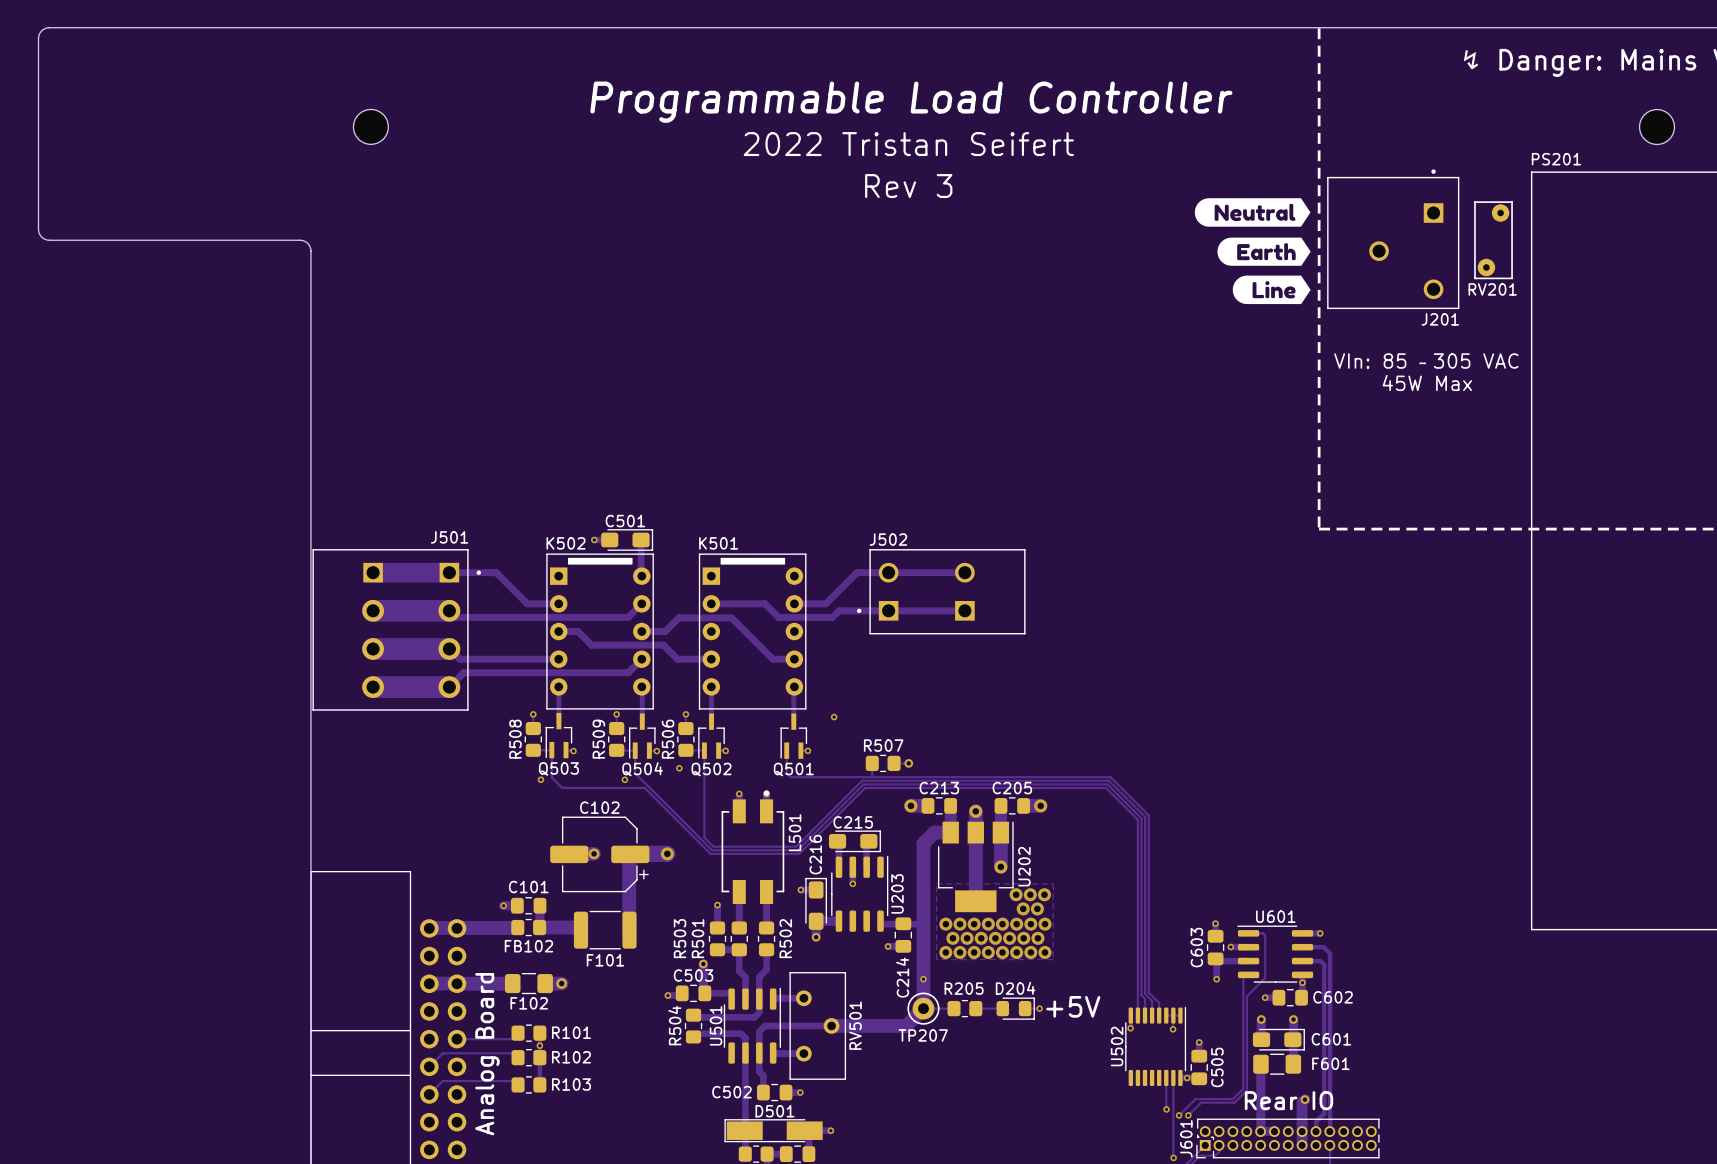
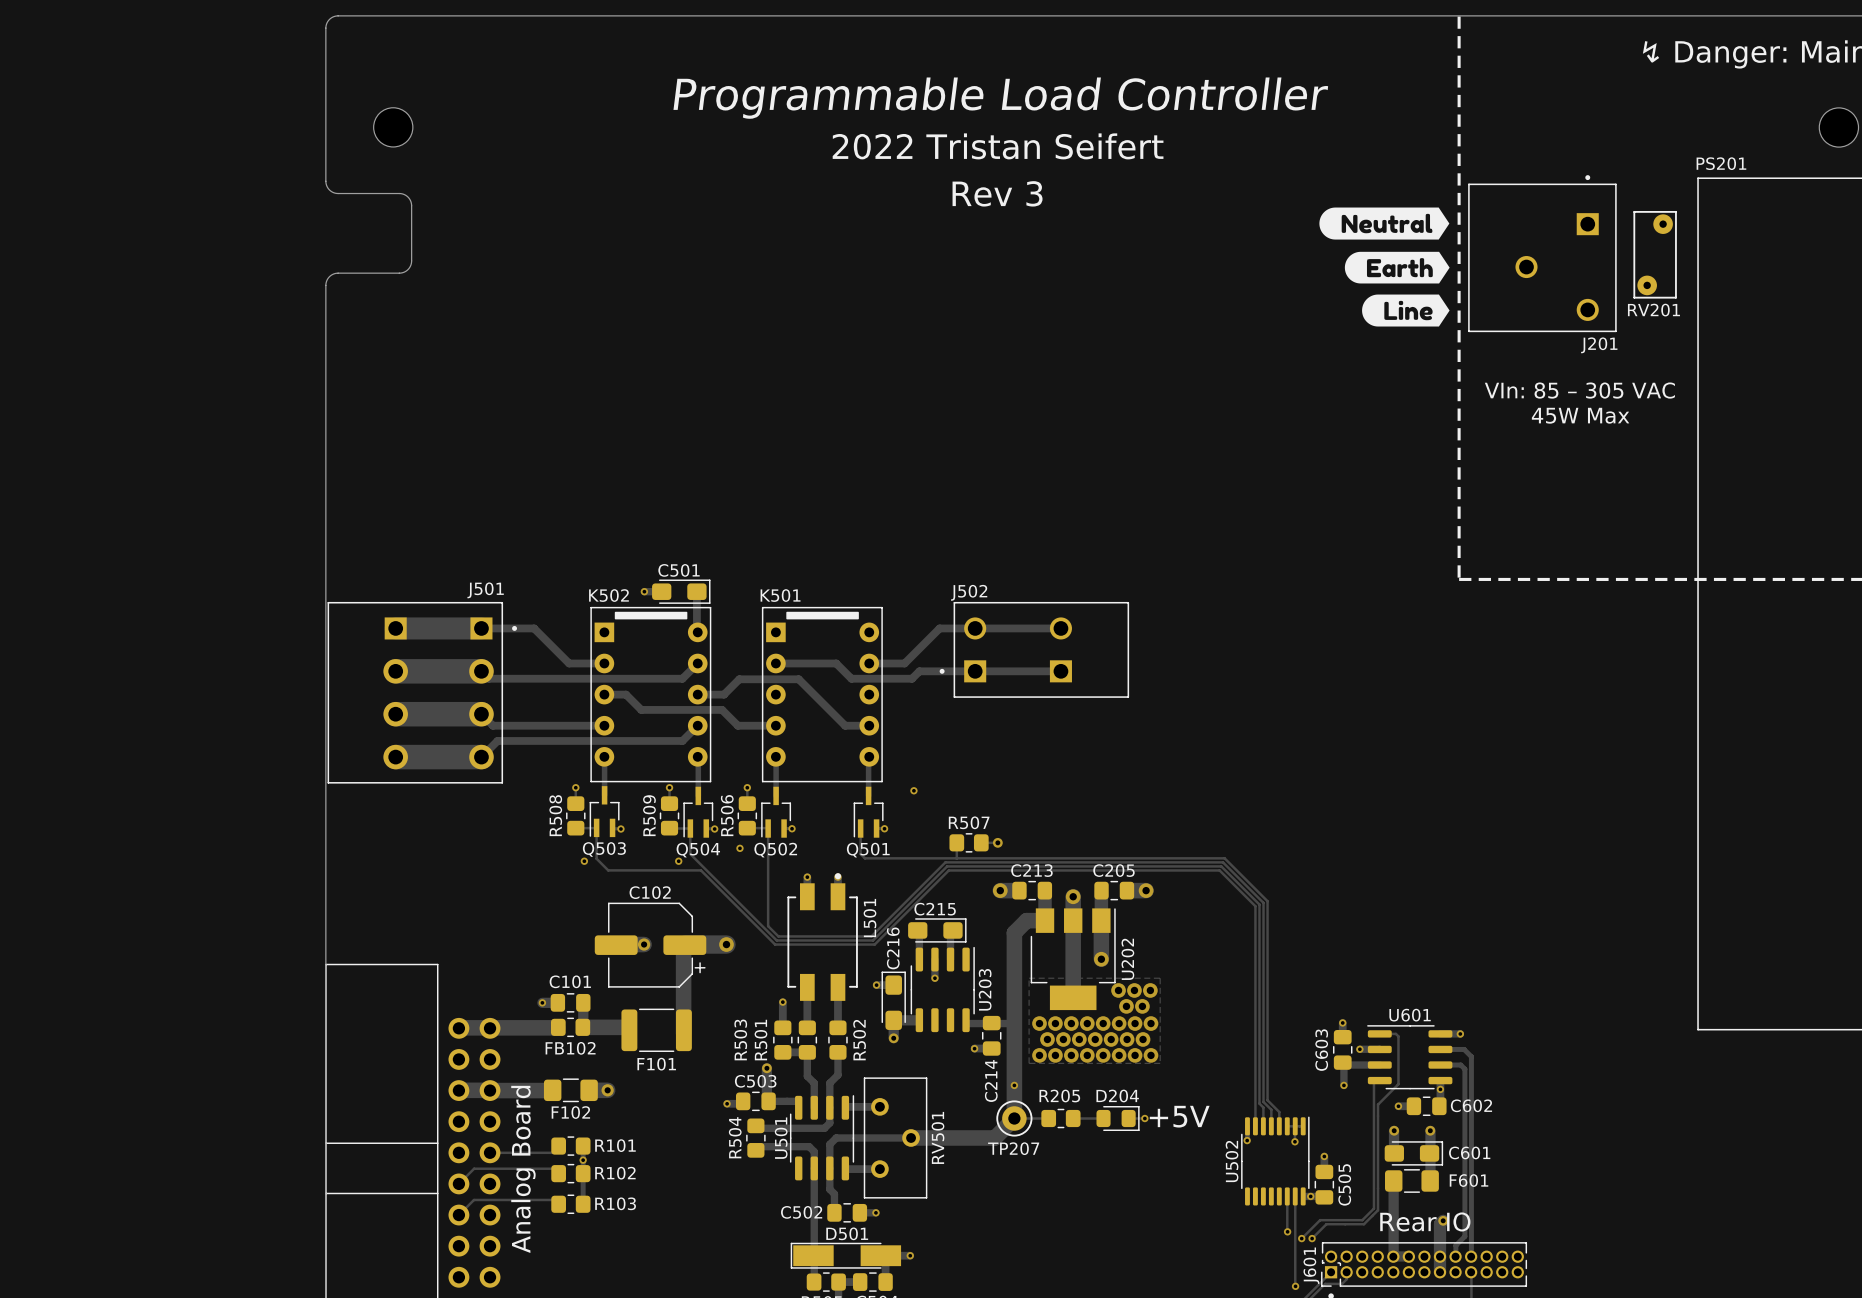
board edge: (321, 27) (49, 27) (41, 30) (38, 38) (38, 229) (42, 237) (49, 240) (301, 240) (306, 242) (310, 247) (310, 267) -> (338, 15) (330, 18) (325, 26) (326, 185) (330, 190) (336, 193) (399, 193) (407, 196) (411, 204) (411, 260) (408, 268) (402, 272) (336, 273) (329, 276) (325, 285)

